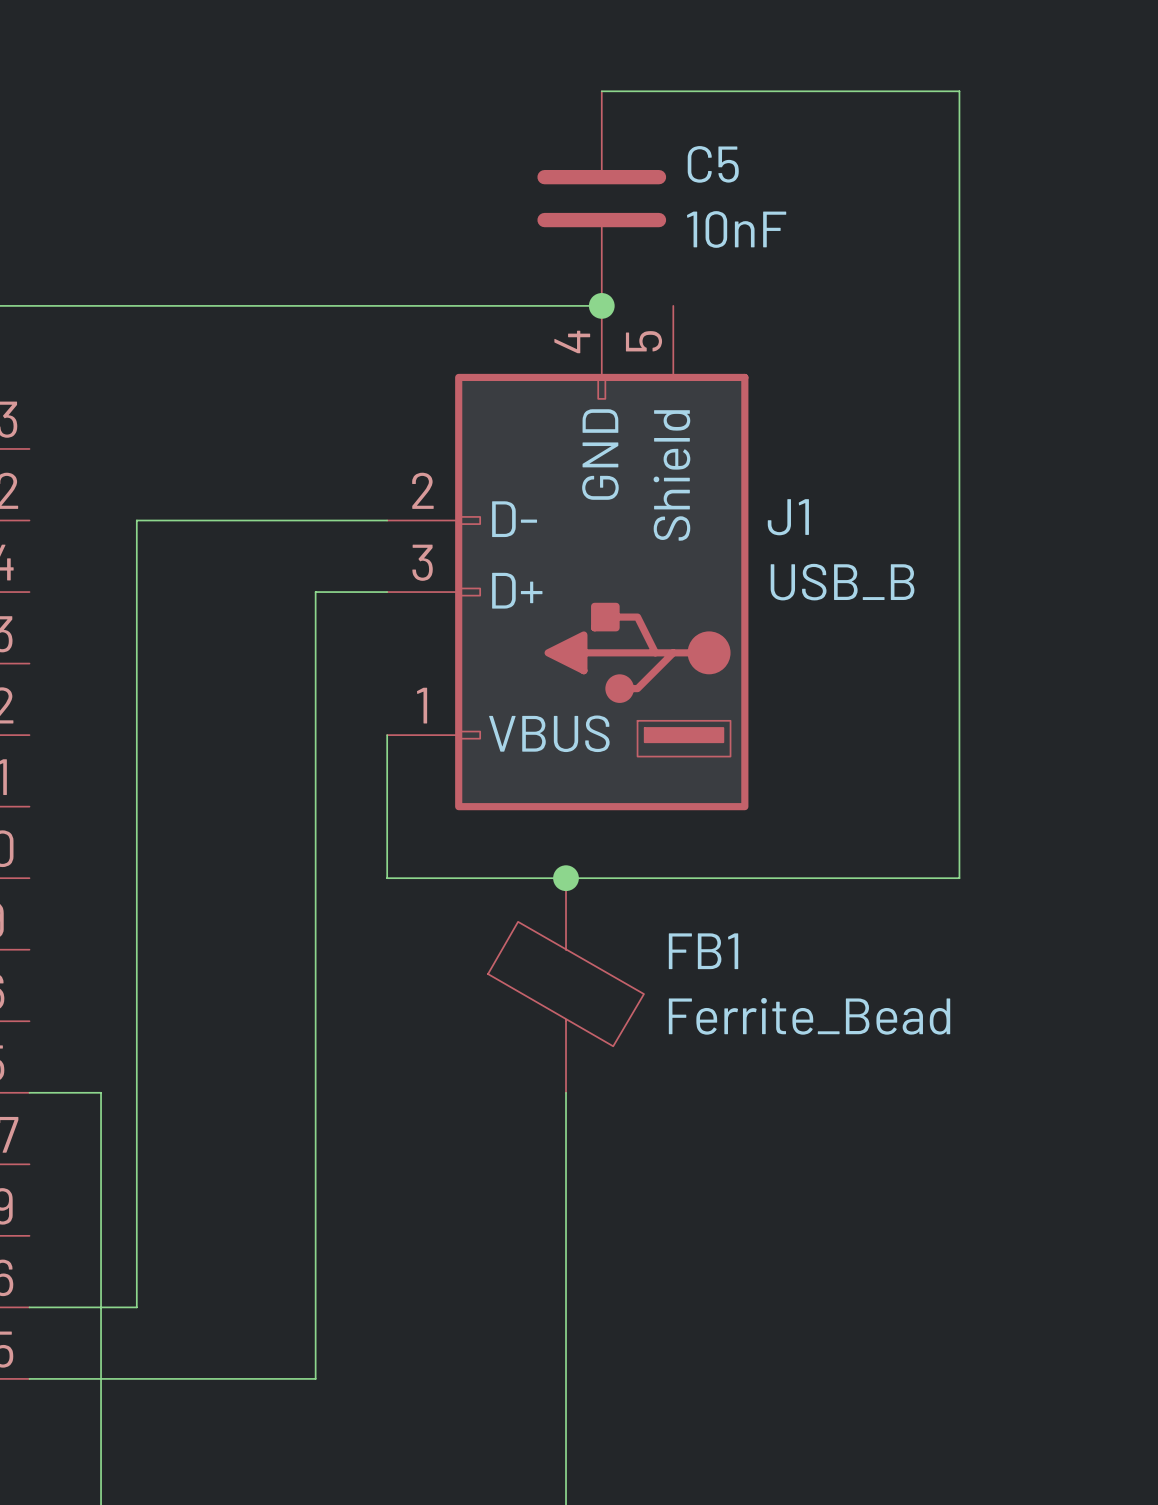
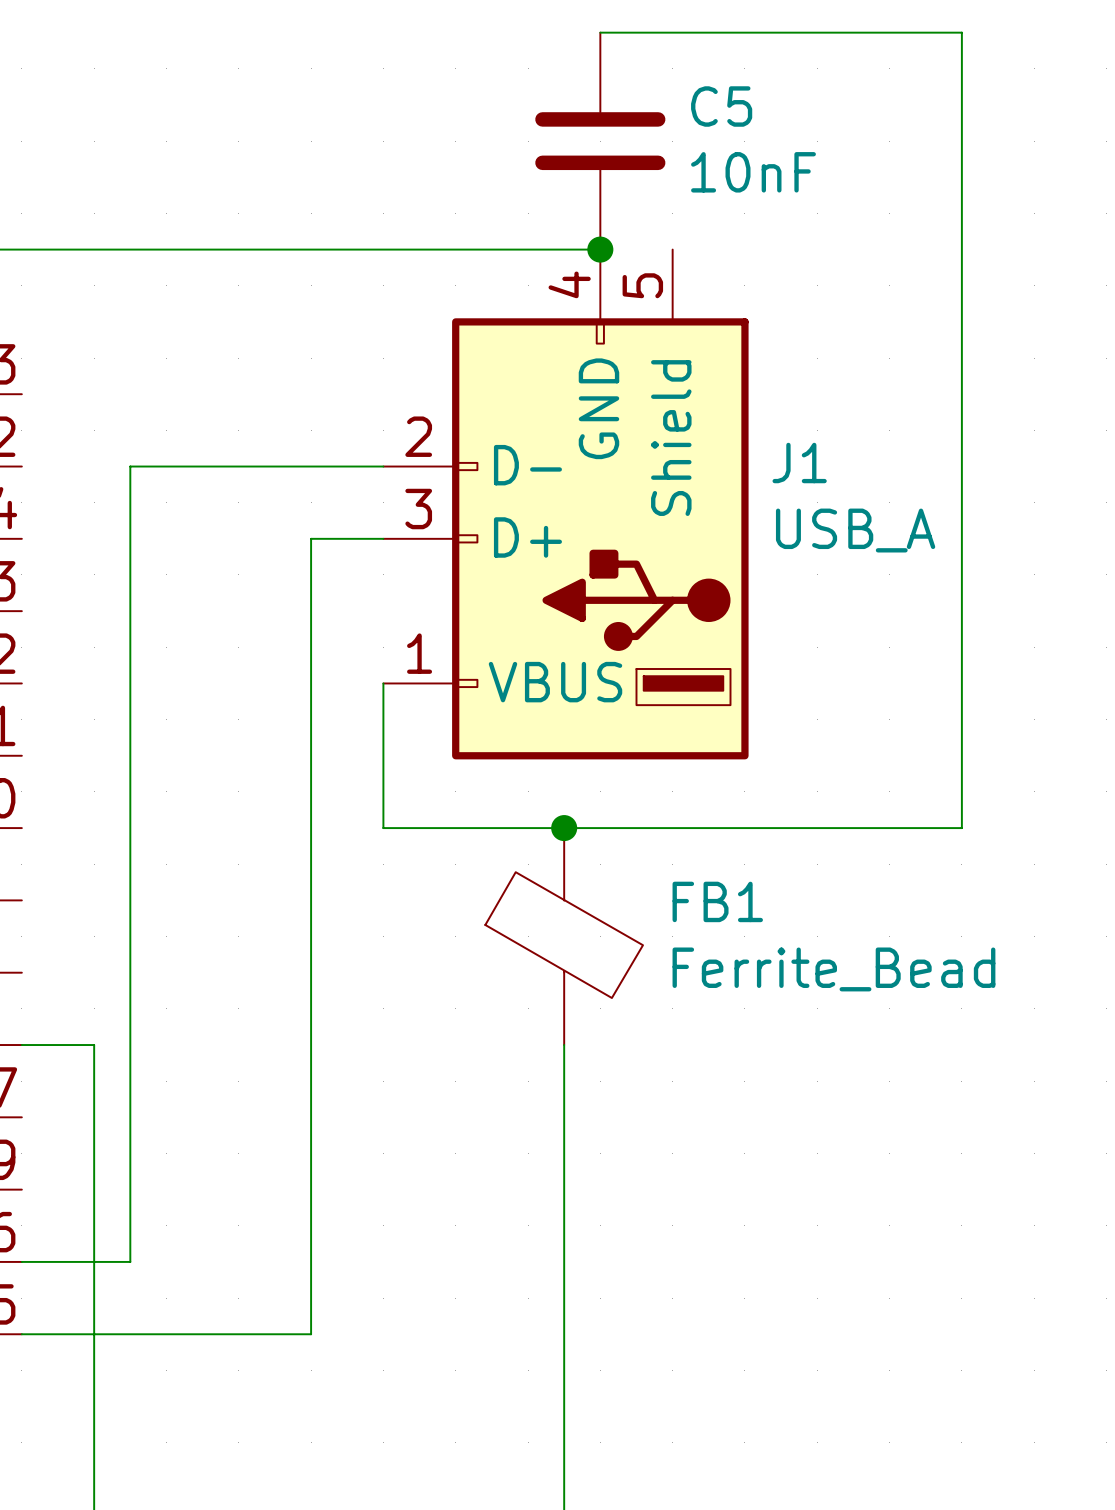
J1 value: USB_B (842, 582) -> USB_A (855, 530)

